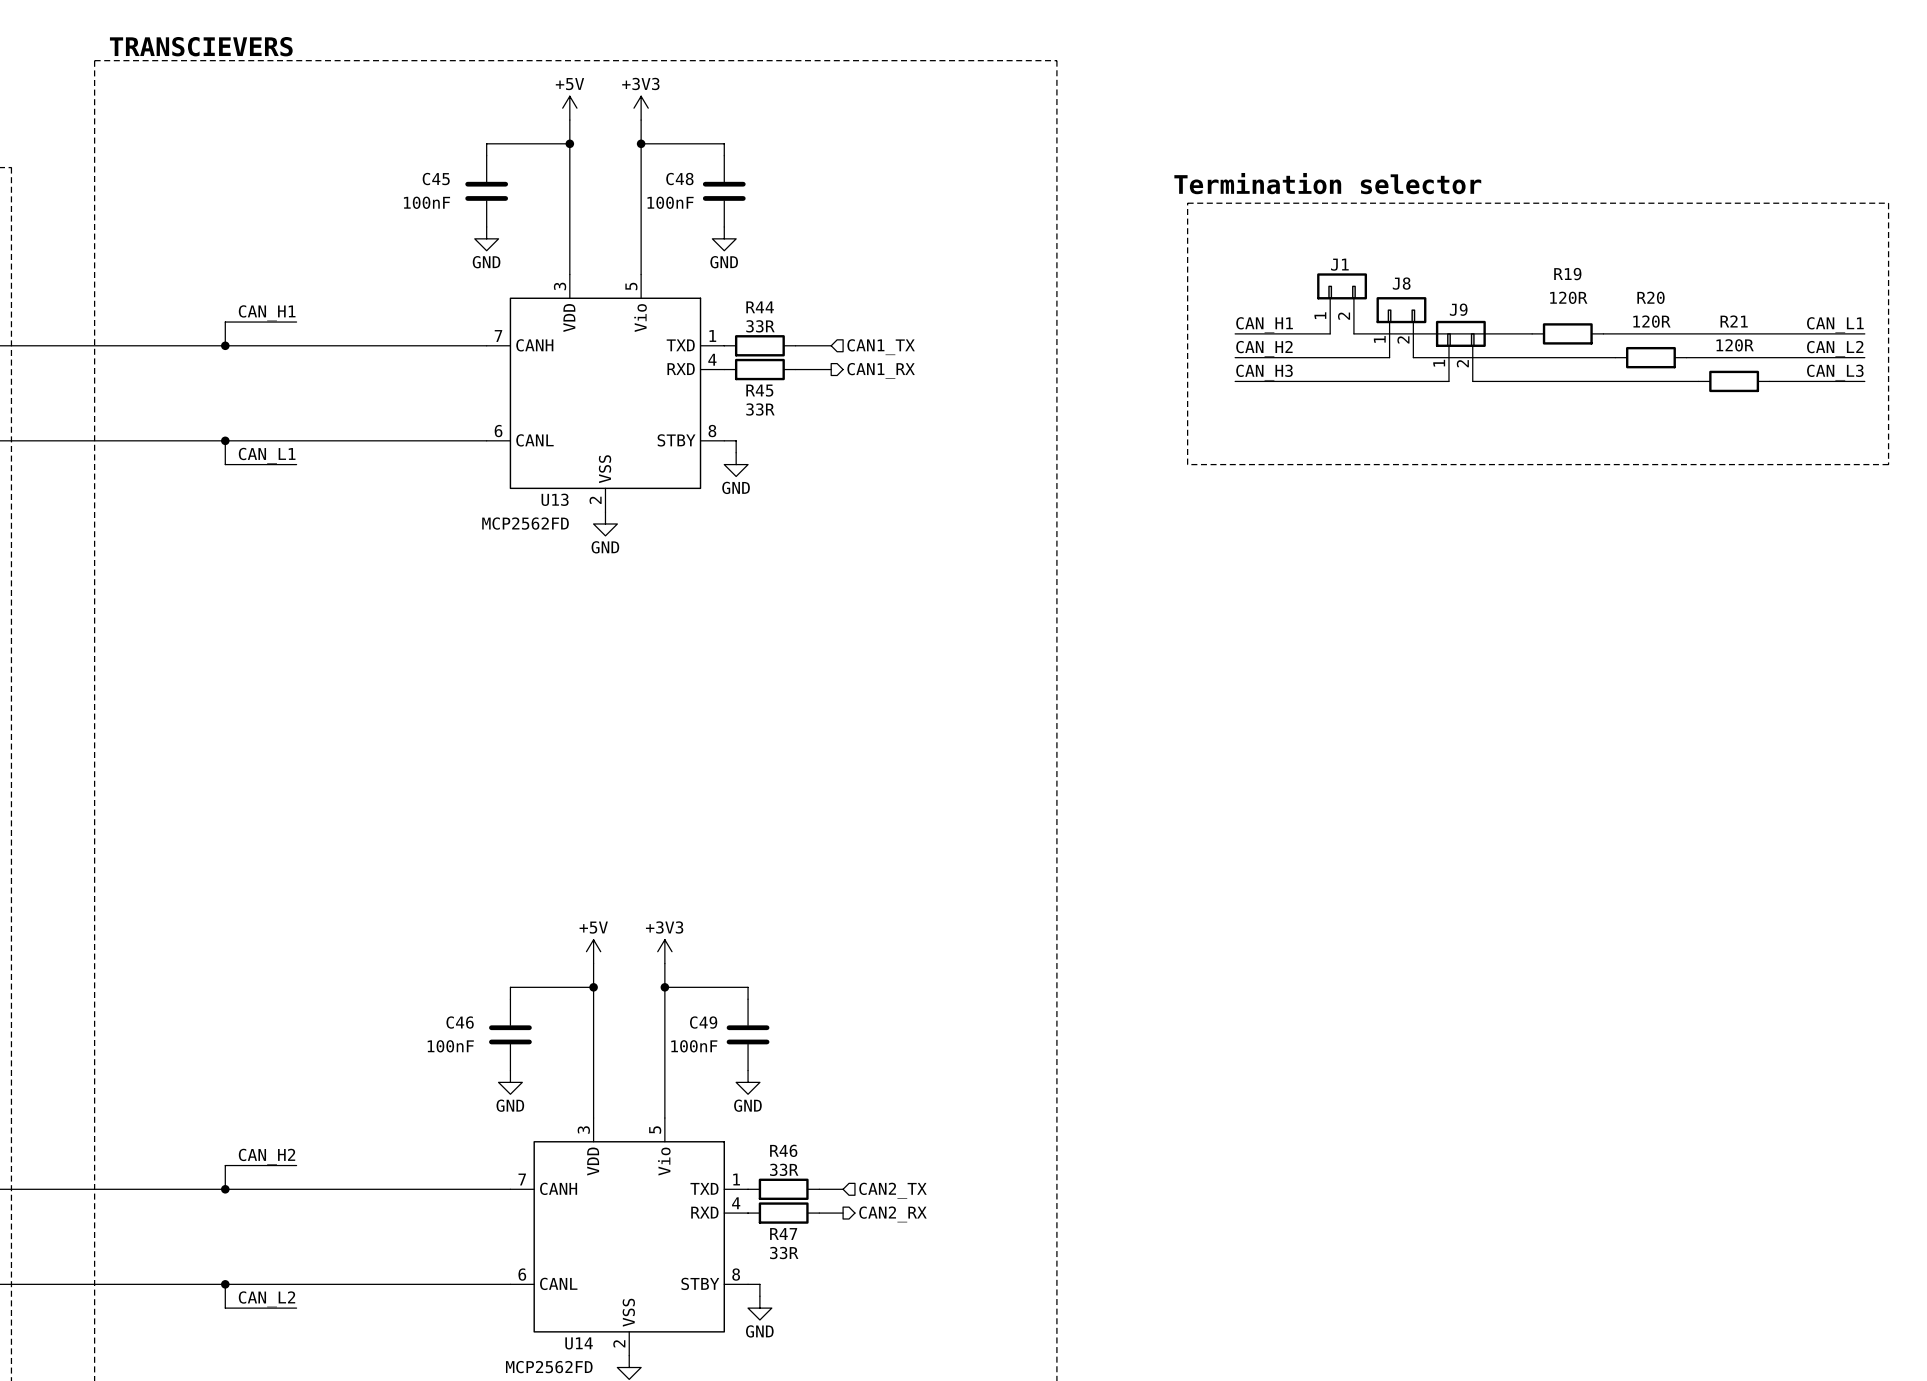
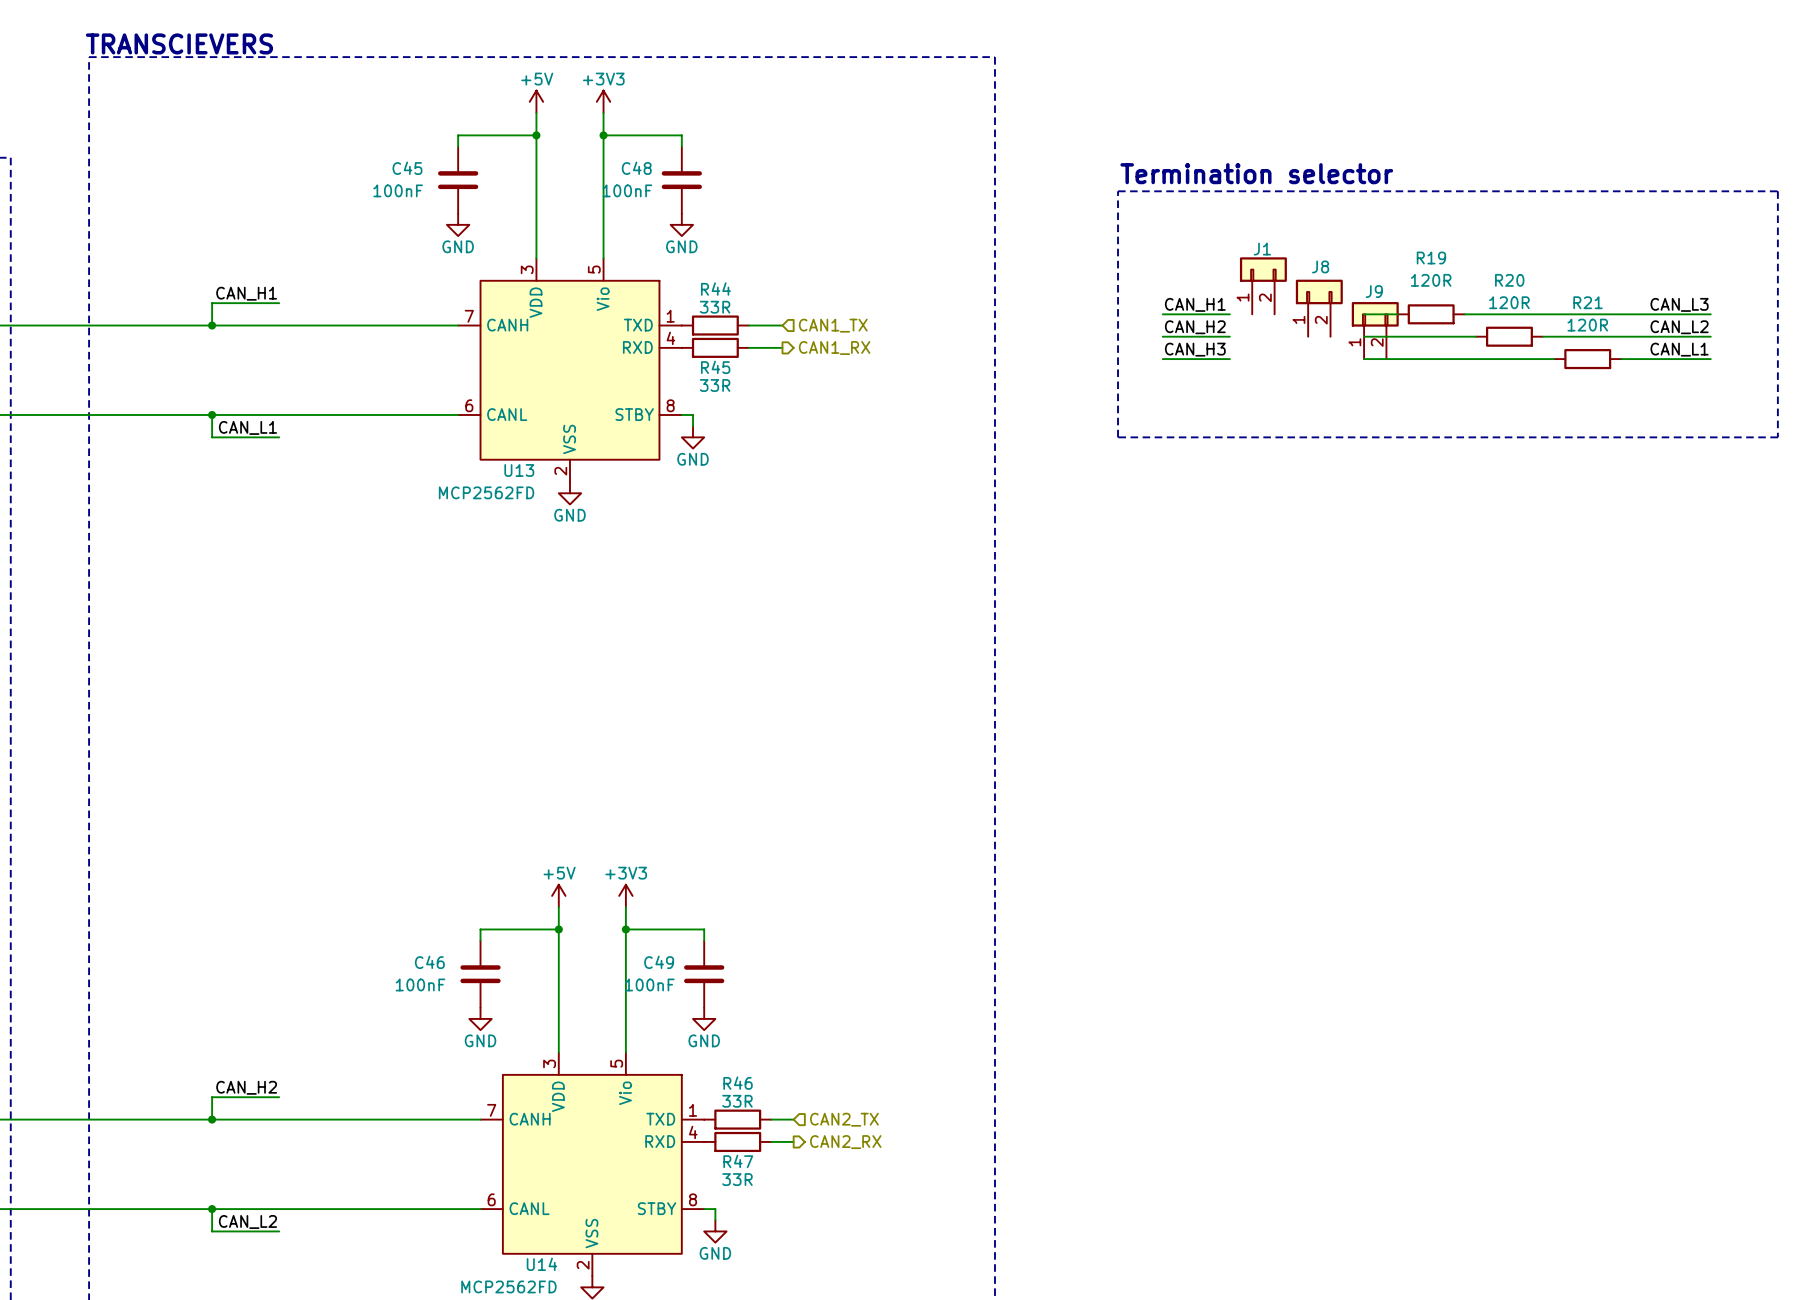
label position: CAN_L1 (1835, 325) -> CAN_L1 (1679, 349)
wire: (1306, 333) (1330, 333) -> none
wire: (1353, 333) (1448, 333) -> none
wire: (1484, 333) (1532, 333) -> (1464, 314) (1509, 314)
R19 position: (1567, 333) -> (1431, 314)
wire: (1817, 333) (1864, 333) -> none
label position: CAN_L2 (1835, 348) -> CAN_L2 (1679, 327)
wire: (1306, 357) (1389, 357) -> none
wire: (1413, 357) (1448, 357) -> none
wire: (1567, 357) (1615, 357) -> (1543, 336) (1587, 336)
R20 position: (1650, 357) -> (1509, 336)
wire: (1817, 357) (1864, 357) -> none
label position: CAN_L3 (1835, 372) -> CAN_L3 (1679, 304)
wire: (1306, 381) (1448, 381) -> (1386, 359) (1364, 359)
wire: (1650, 381) (1698, 381) -> (1621, 359) (1666, 359)
R21 position: (1734, 381) -> (1587, 359)
wire: (1817, 381) (1864, 381) -> none

